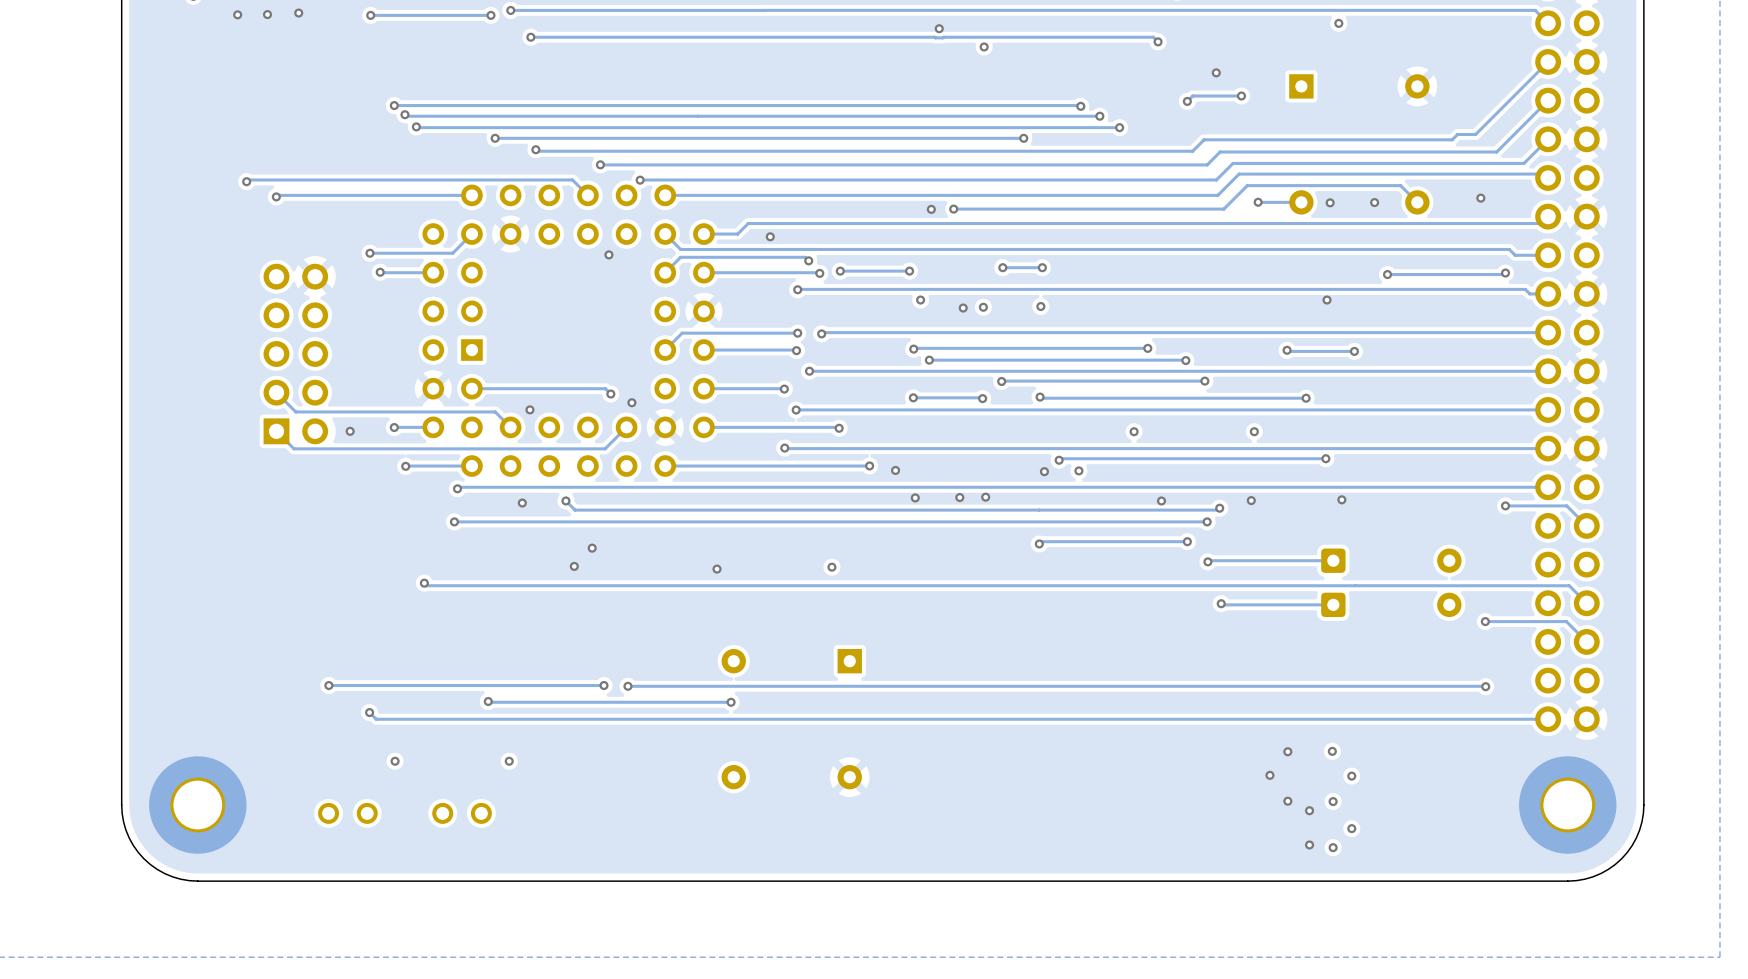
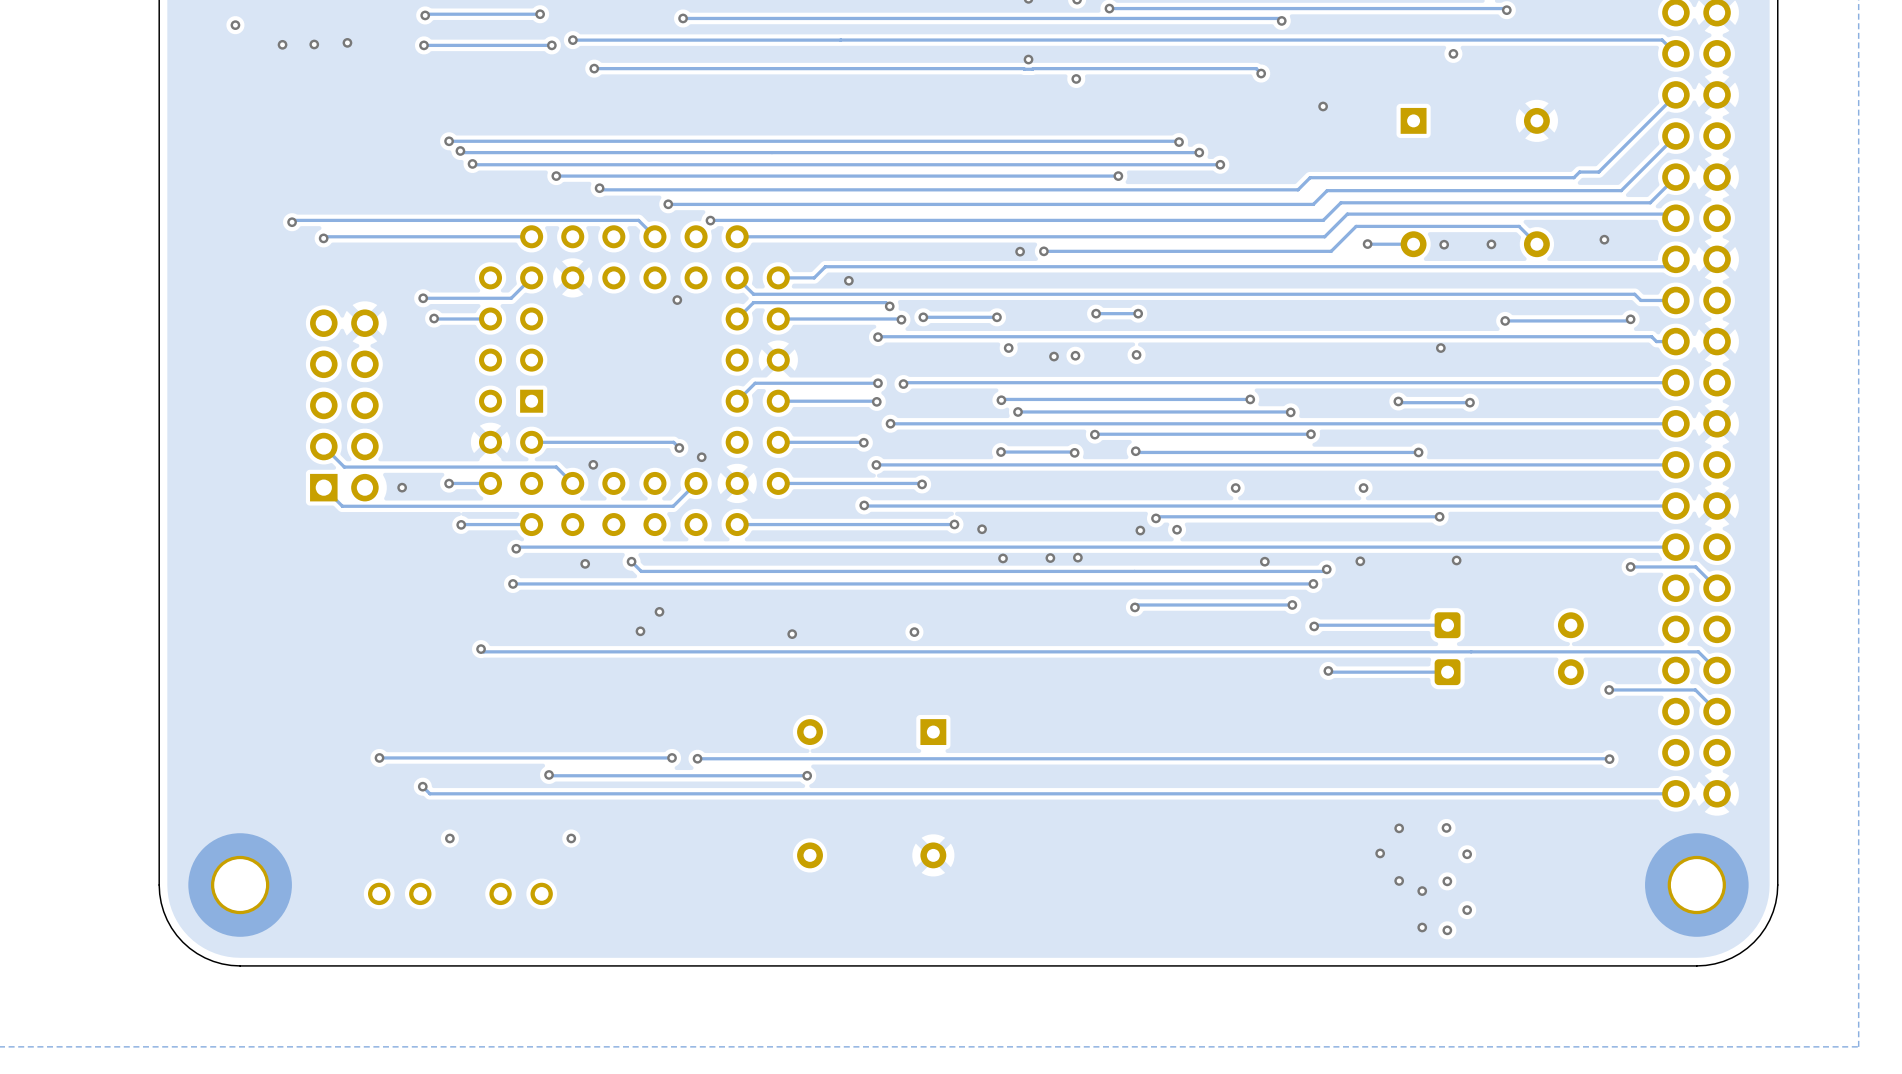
track: (1241, 96) (1192, 96) (1187, 101) -> none
via: (1241, 96) -> none
via: (1187, 101) -> none

